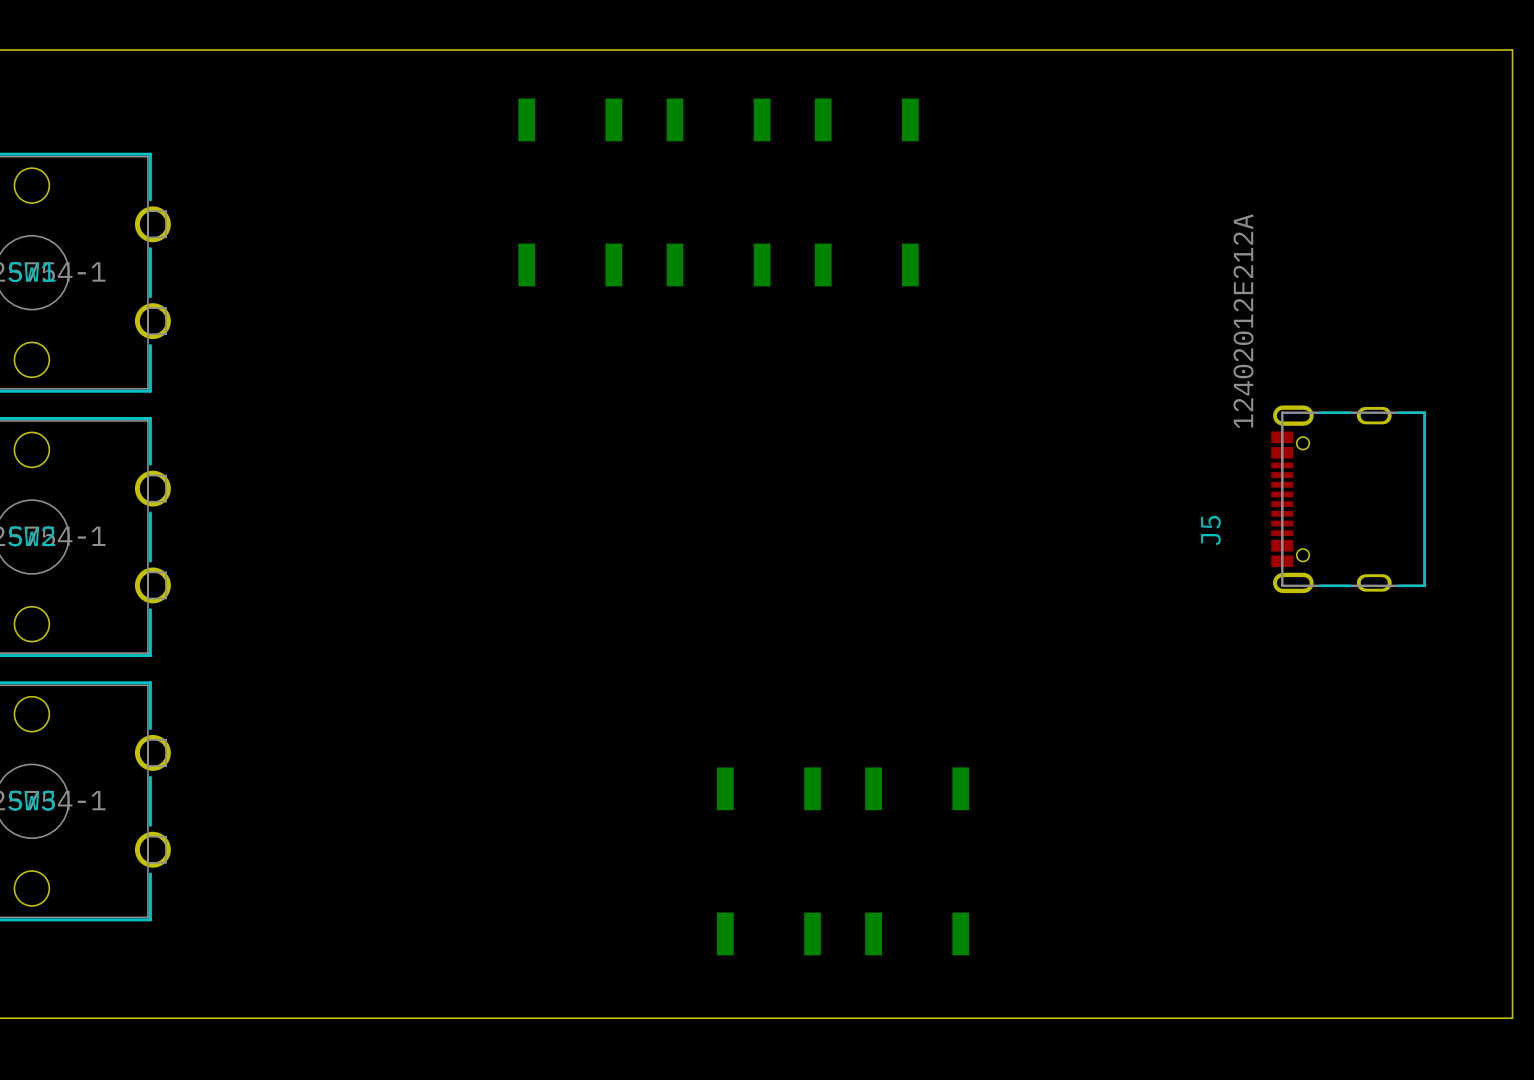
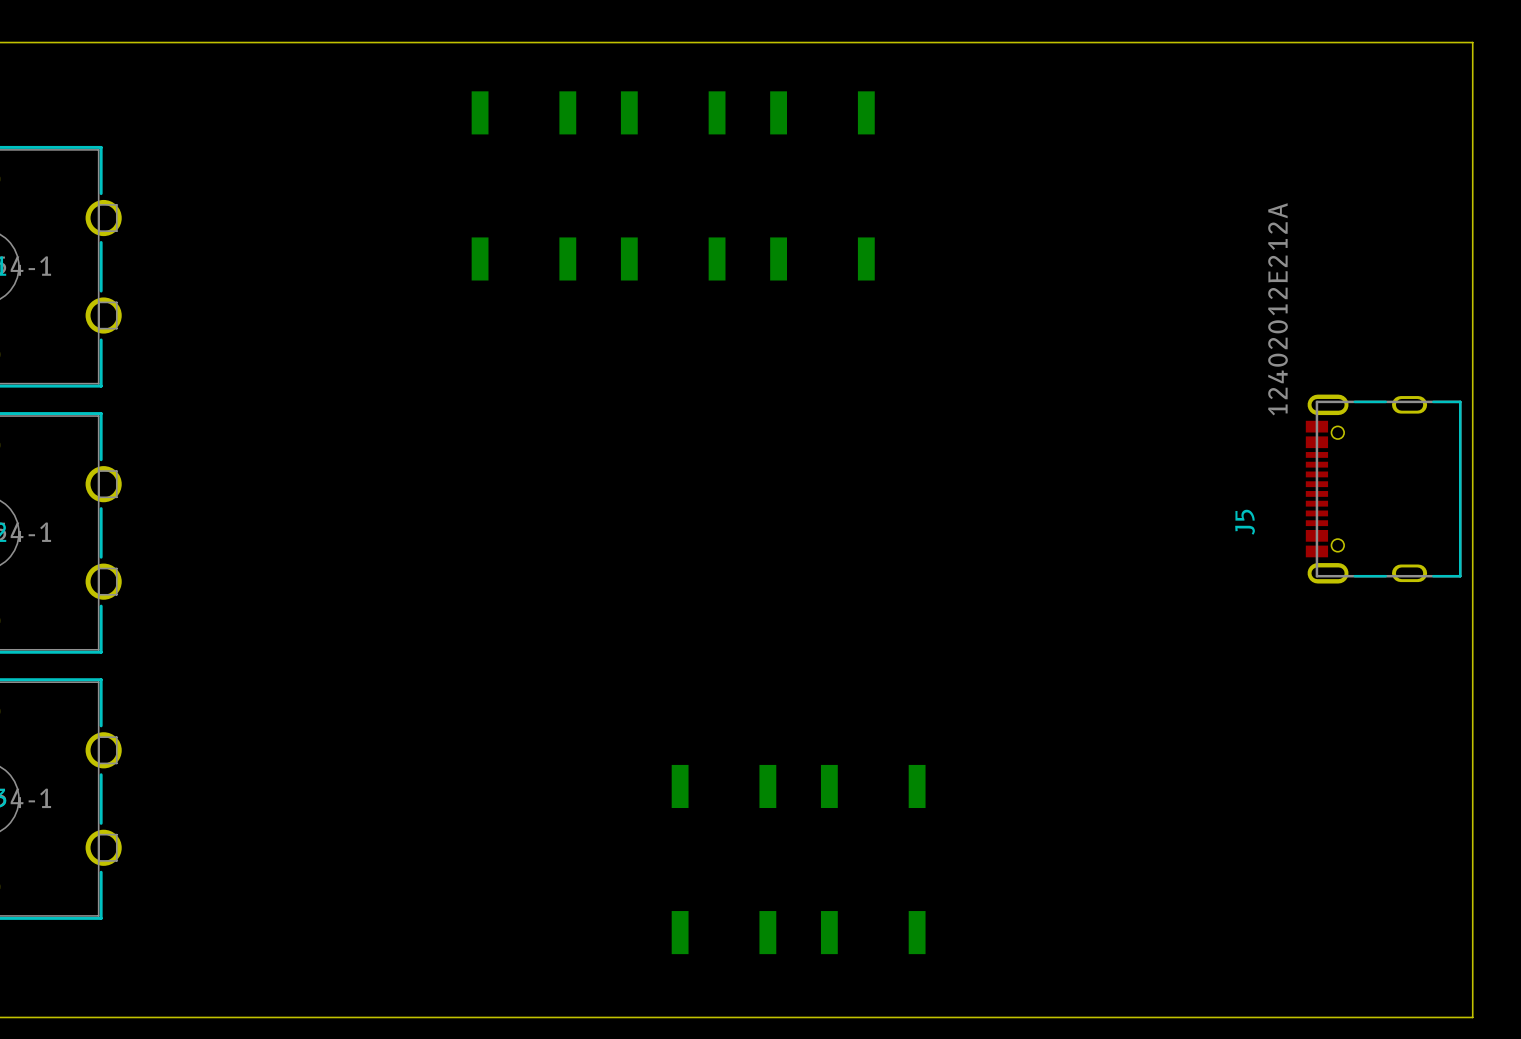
J5 position: (1348, 499) -> (1383, 489)

